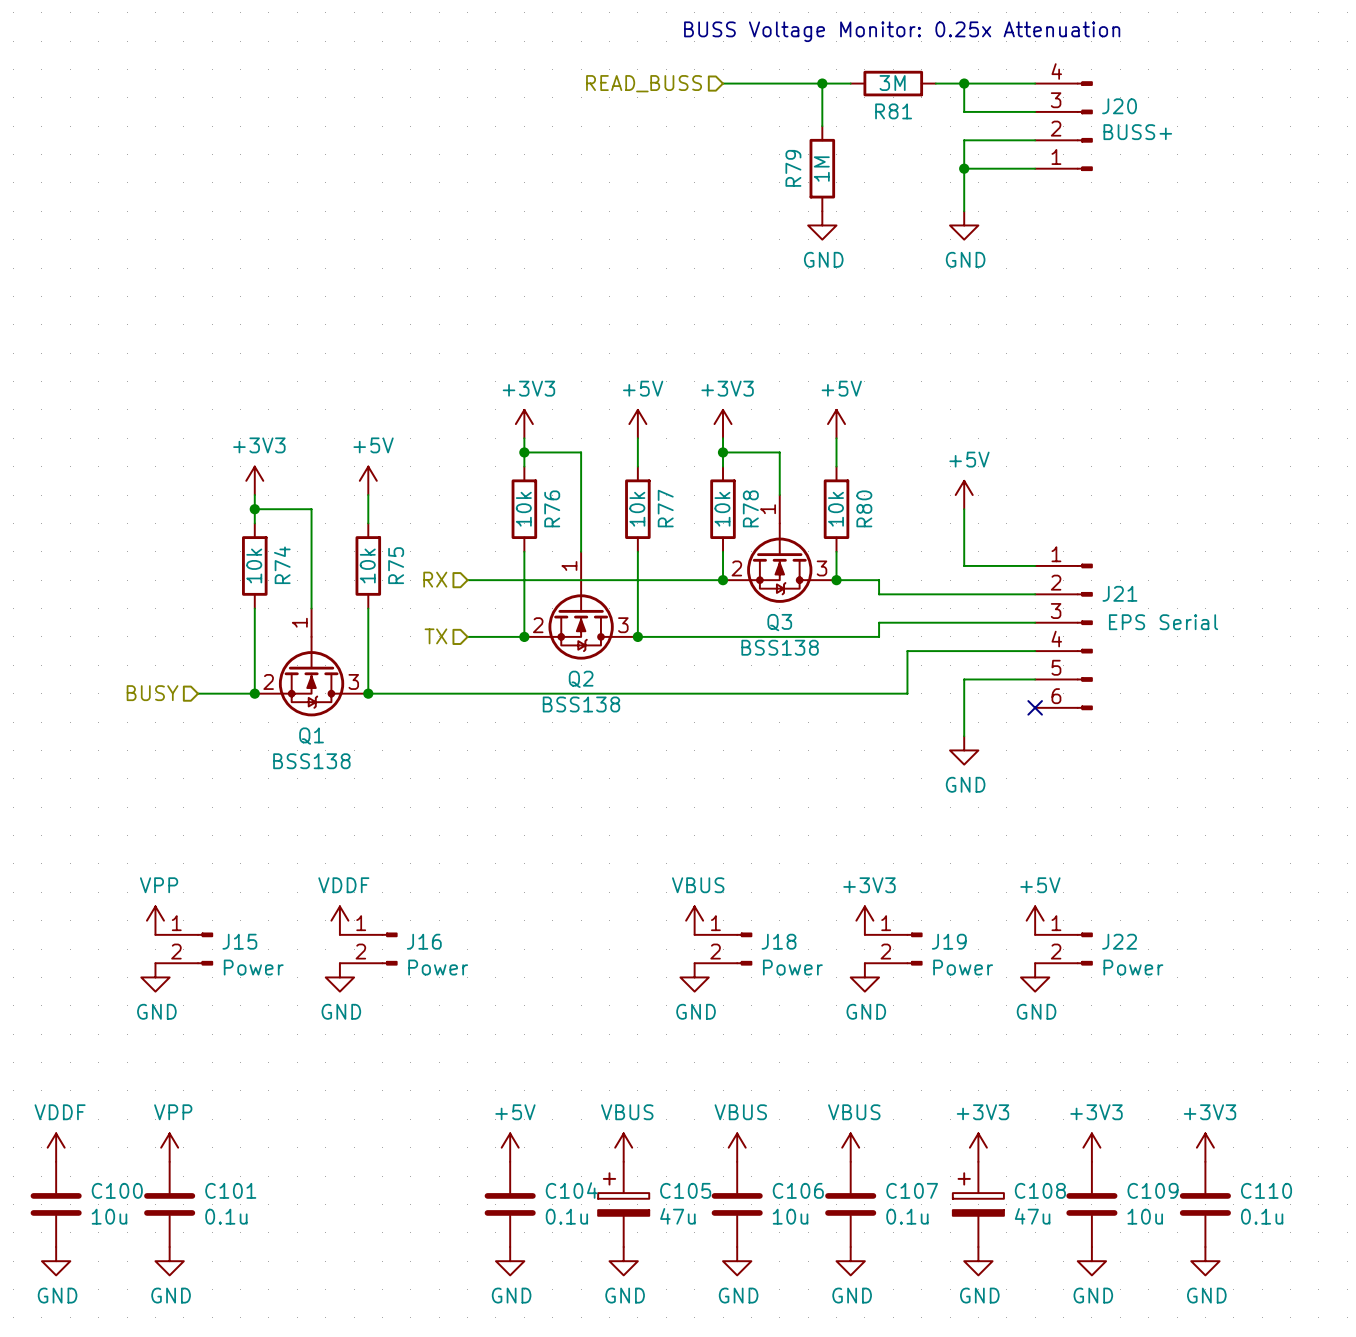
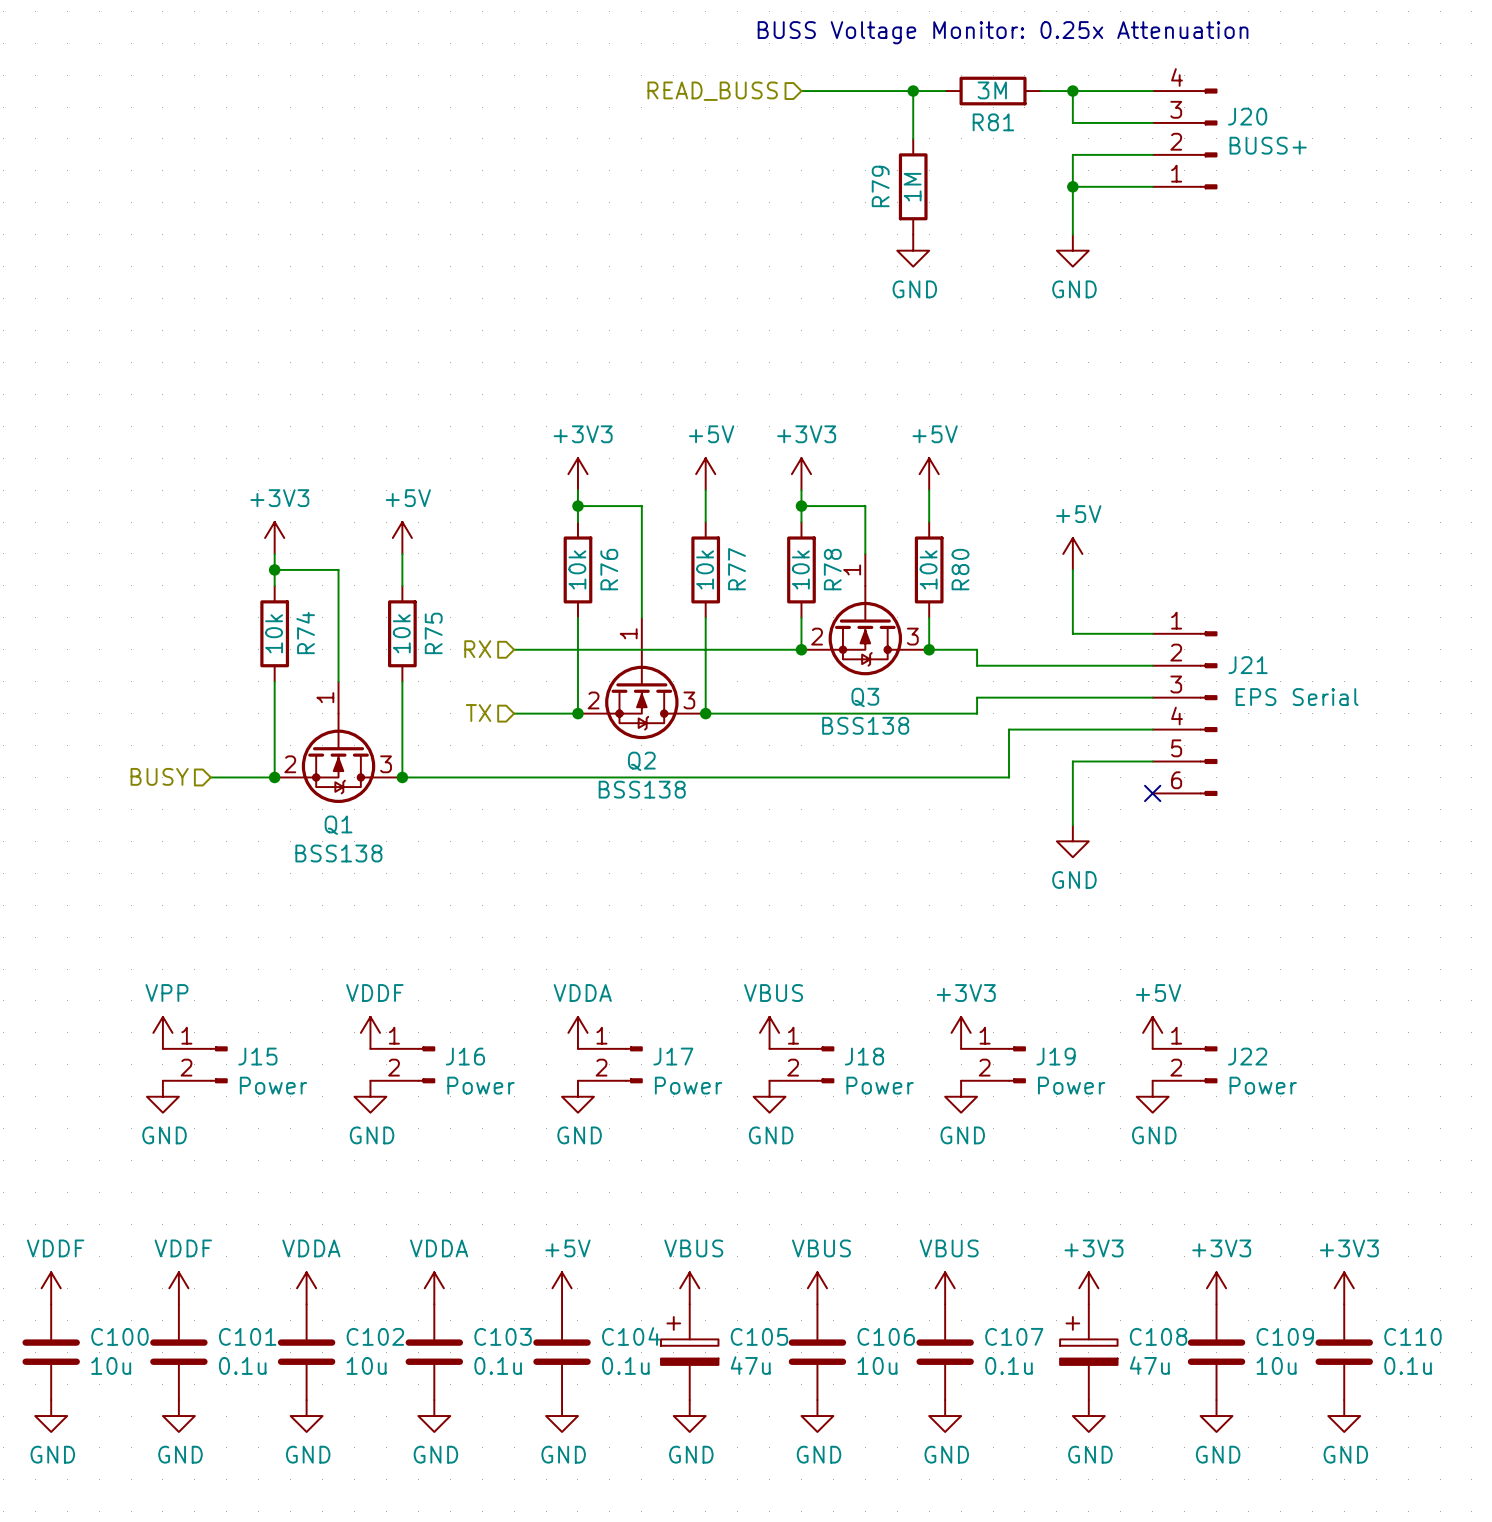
power symbol: none -> VDDA (577, 1032)
J17: none -> Power (610, 1064)
power symbol: none -> GND (577, 1096)
power symbol: VPP (169, 1147) -> VDDF (178, 1288)
power symbol: none -> VDDA (306, 1288)
power symbol: none -> VDDA (434, 1288)
C102: none -> 10u (306, 1352)
C103: none -> 0.1u (434, 1352)
power symbol: none -> GND (306, 1416)
power symbol: none -> GND (434, 1416)

